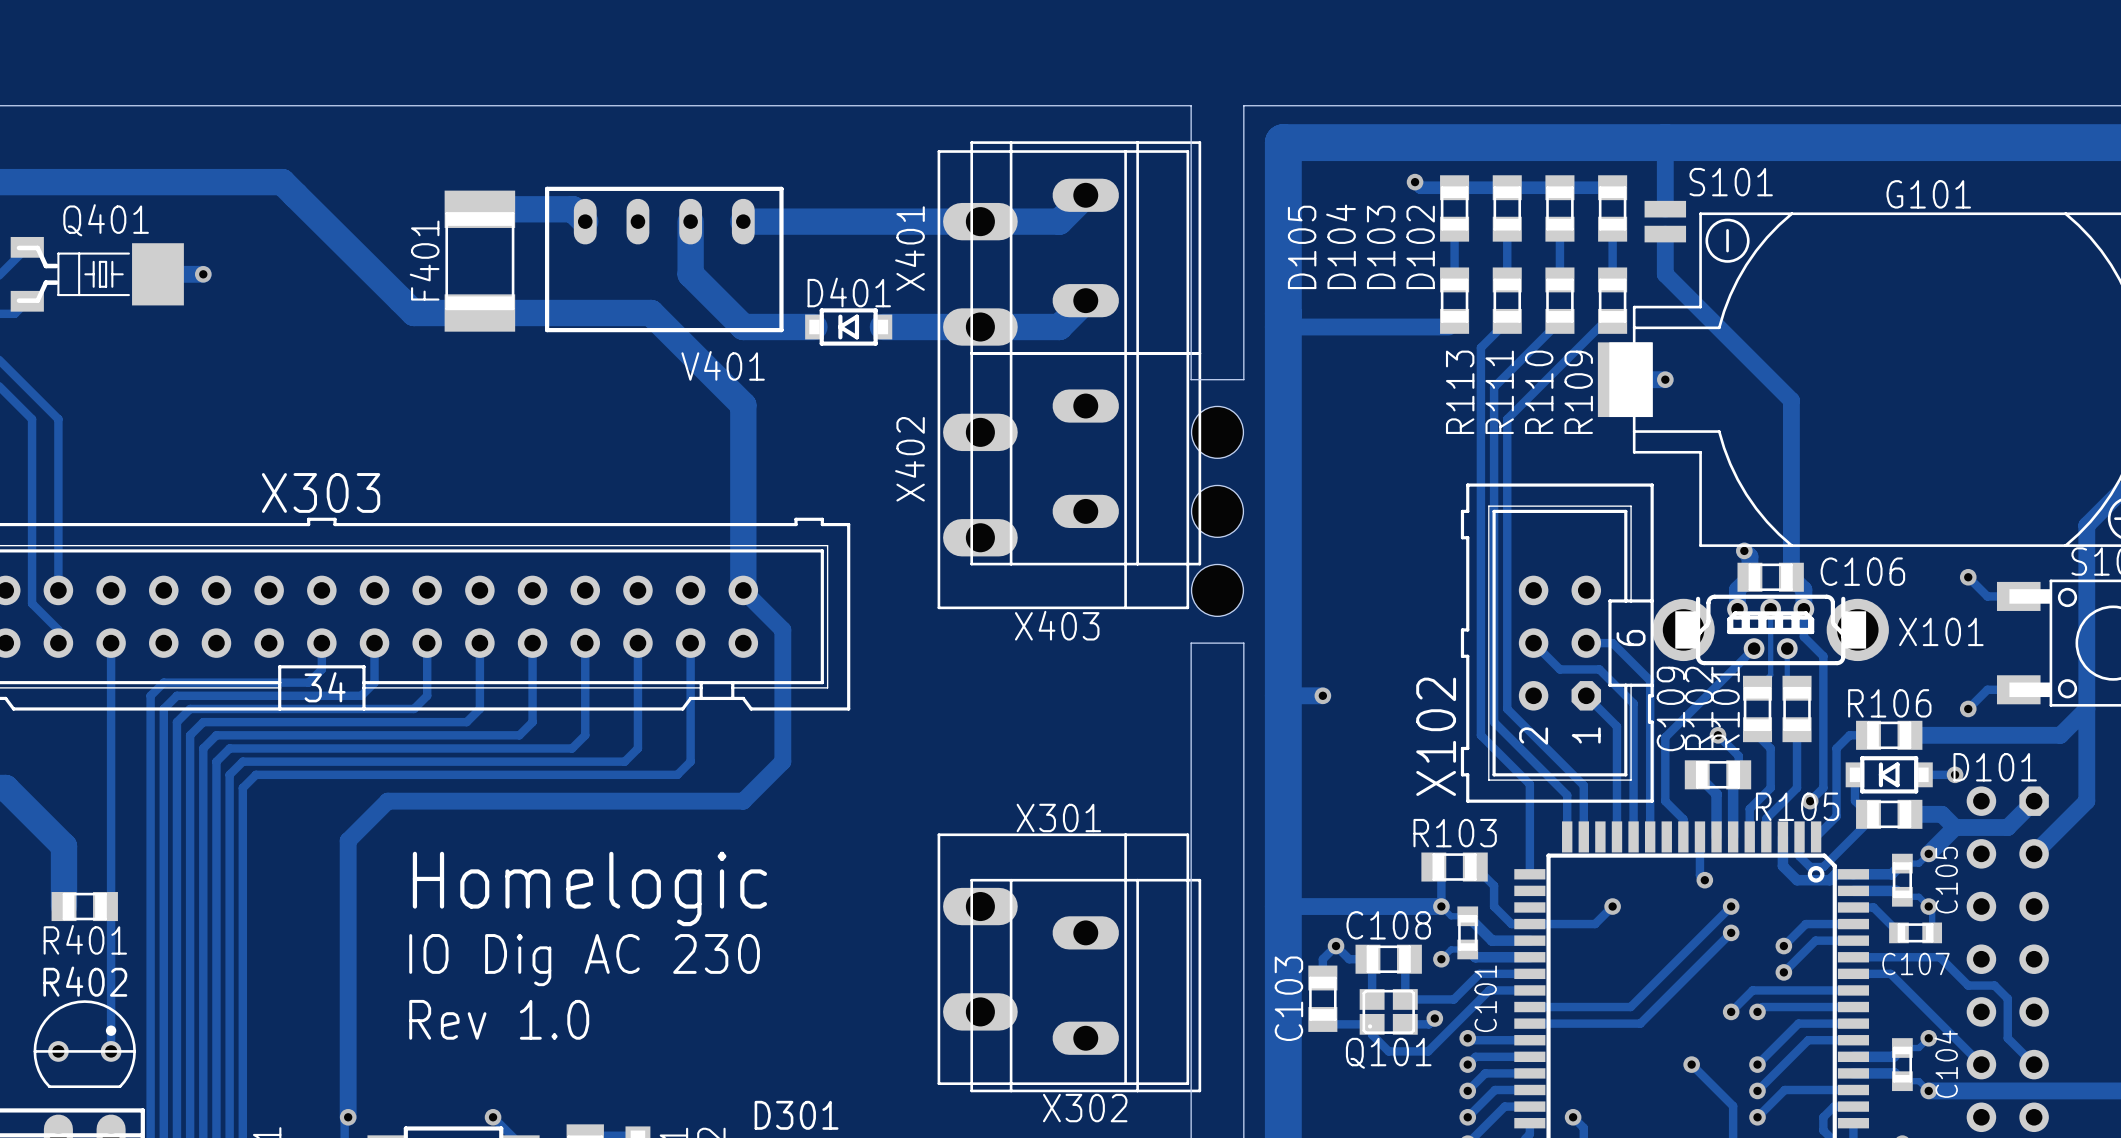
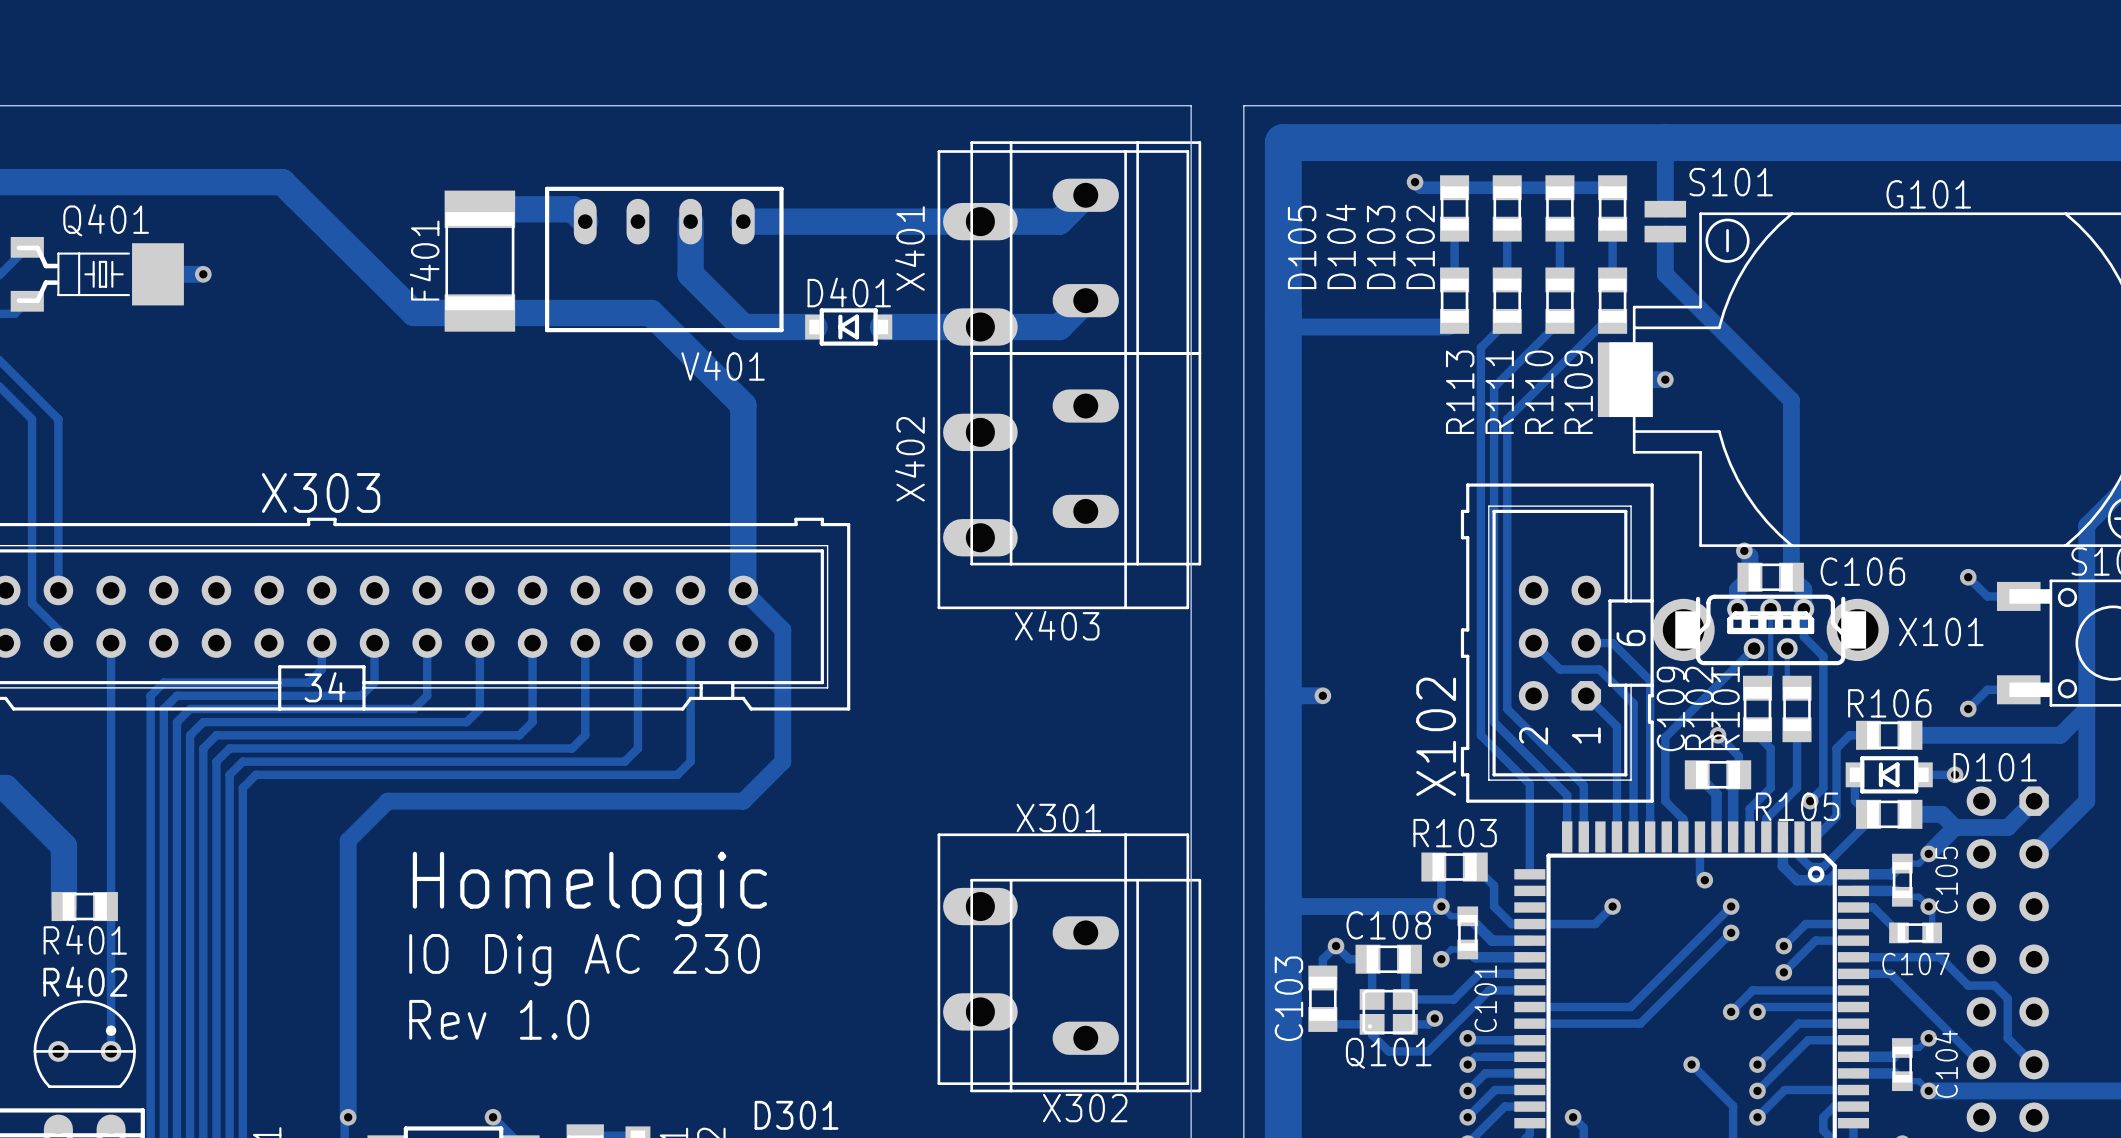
board edge: (1191, 379) (1243, 379) -> (1191, 379) (1191, 643)
hole: (1217, 432) -> none
hole: (1217, 511) -> none
hole: (1217, 590) -> none
board edge: (1191, 643) (1243, 643) -> (1243, 379) (1243, 643)

